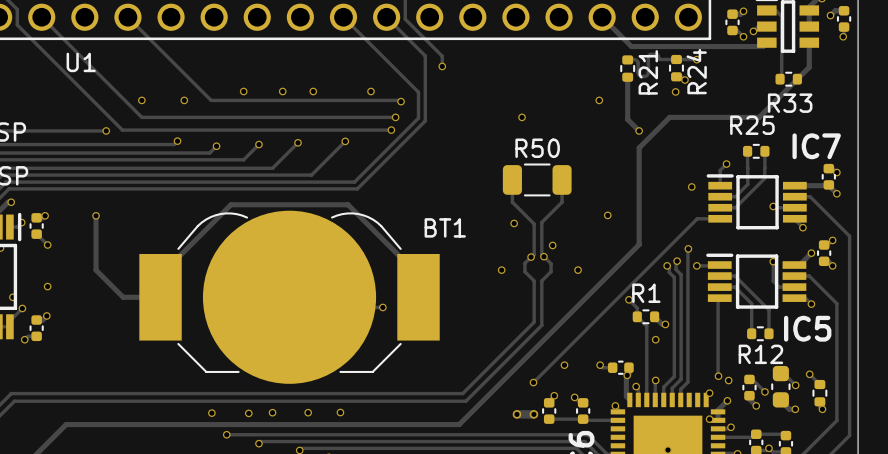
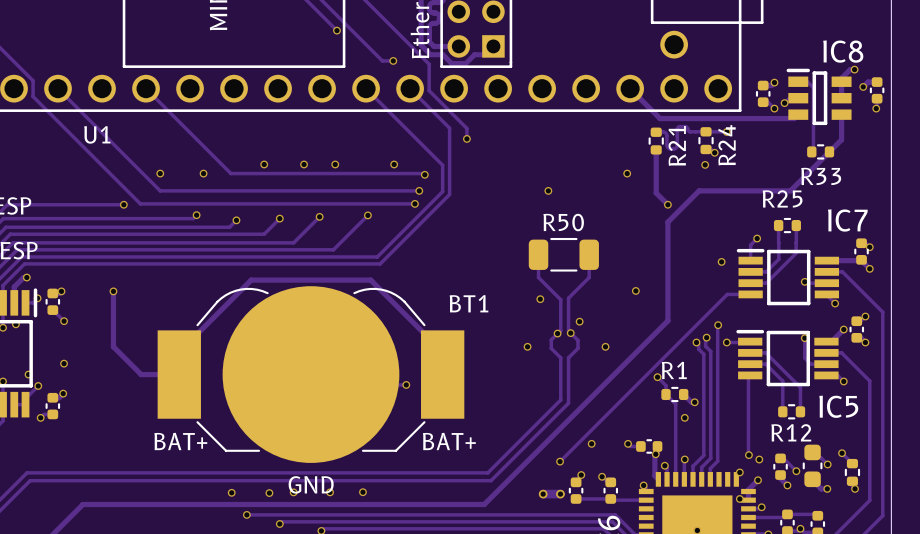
text: none -> BAT+ (180, 441)
text: none -> BAT+ (449, 441)
text: none -> GND (311, 484)

